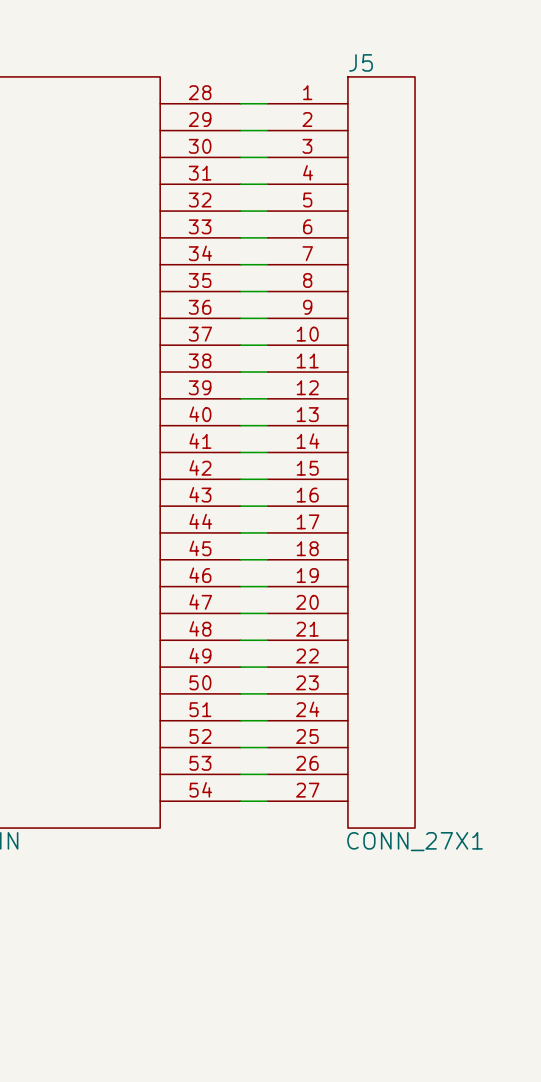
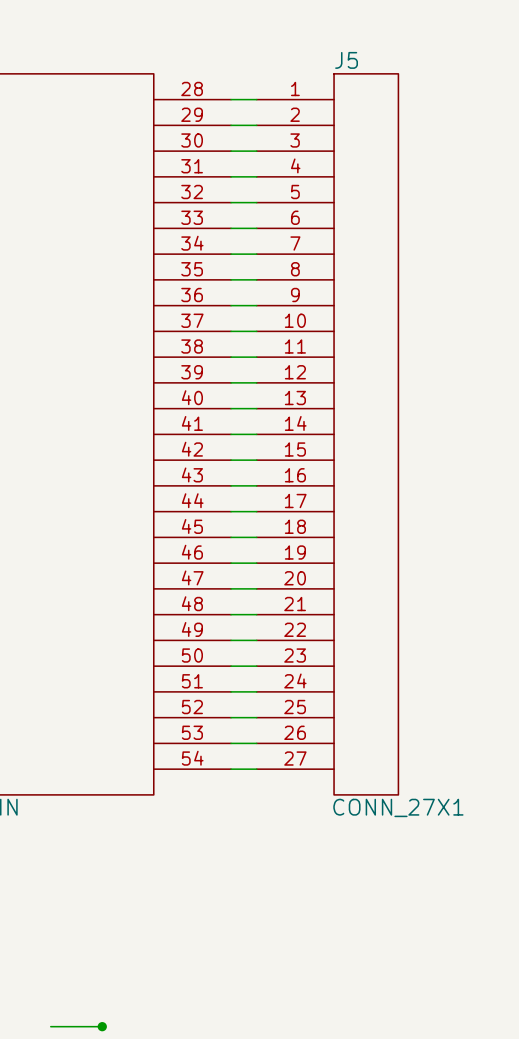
wire: none -> (50, 1026) (102, 1026)
junction: none -> (102, 1026)

